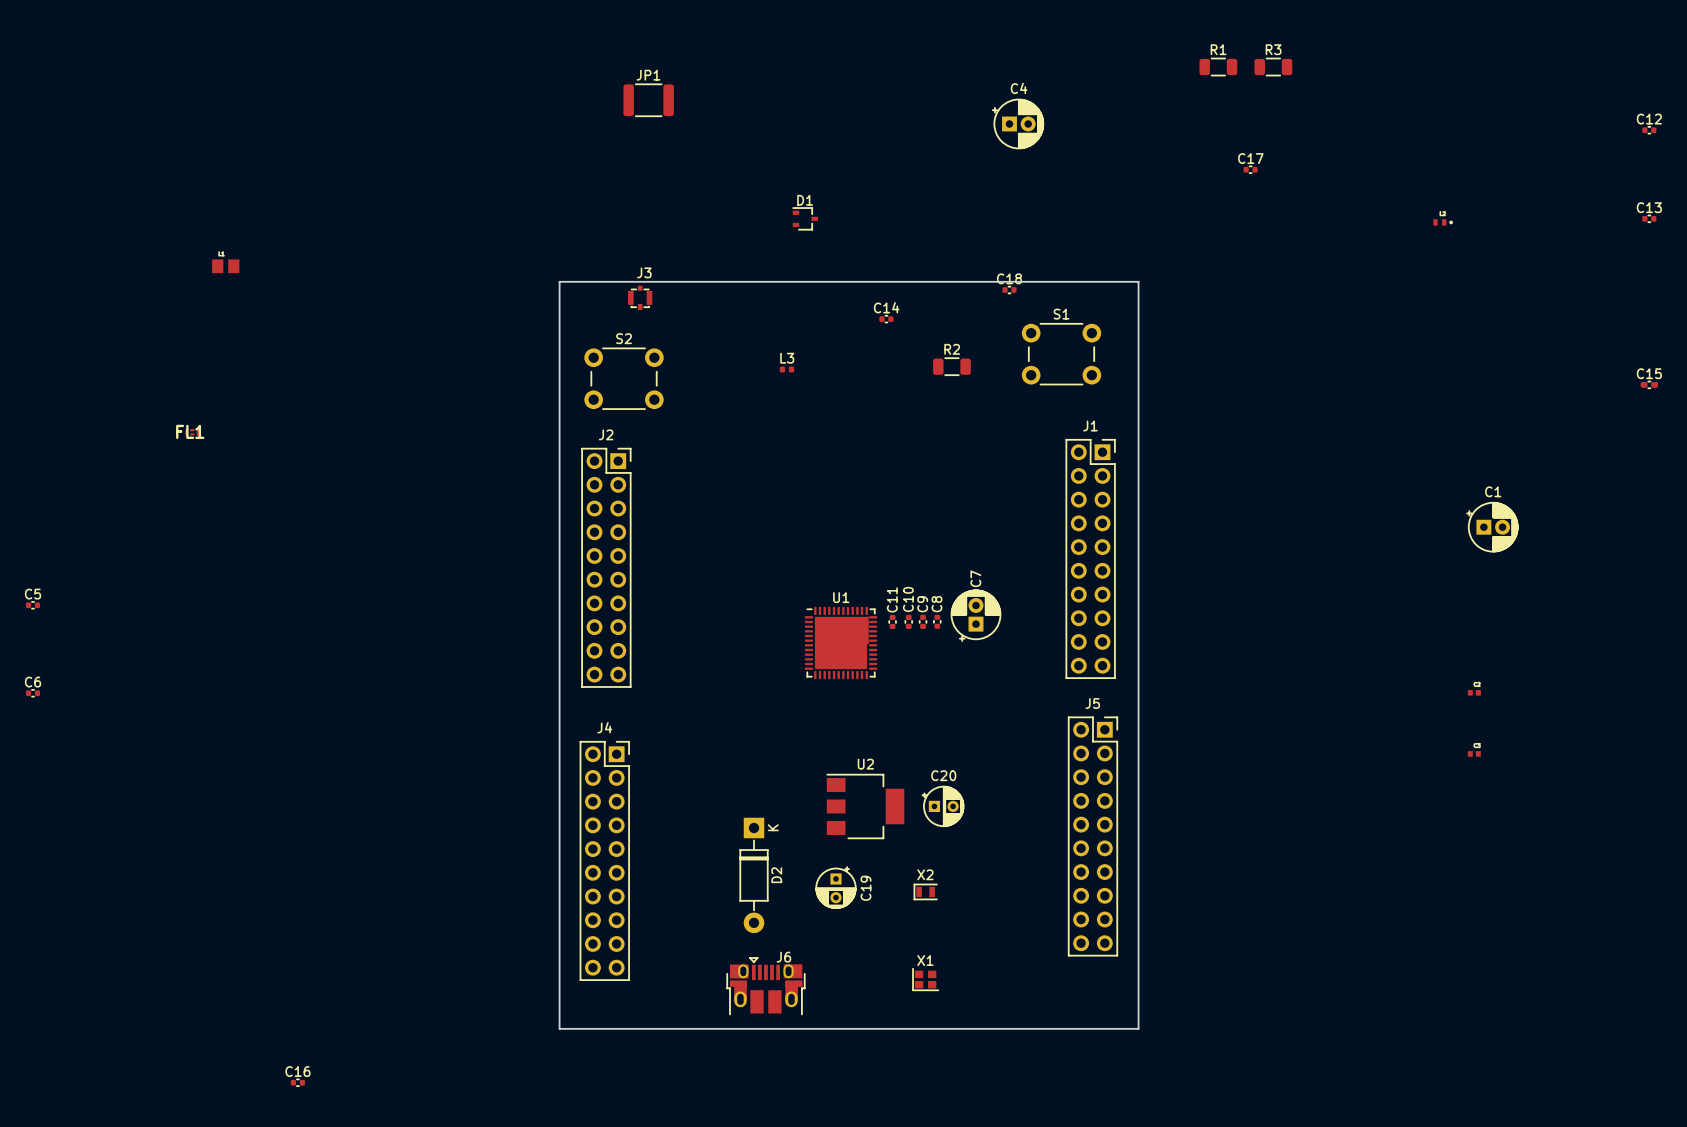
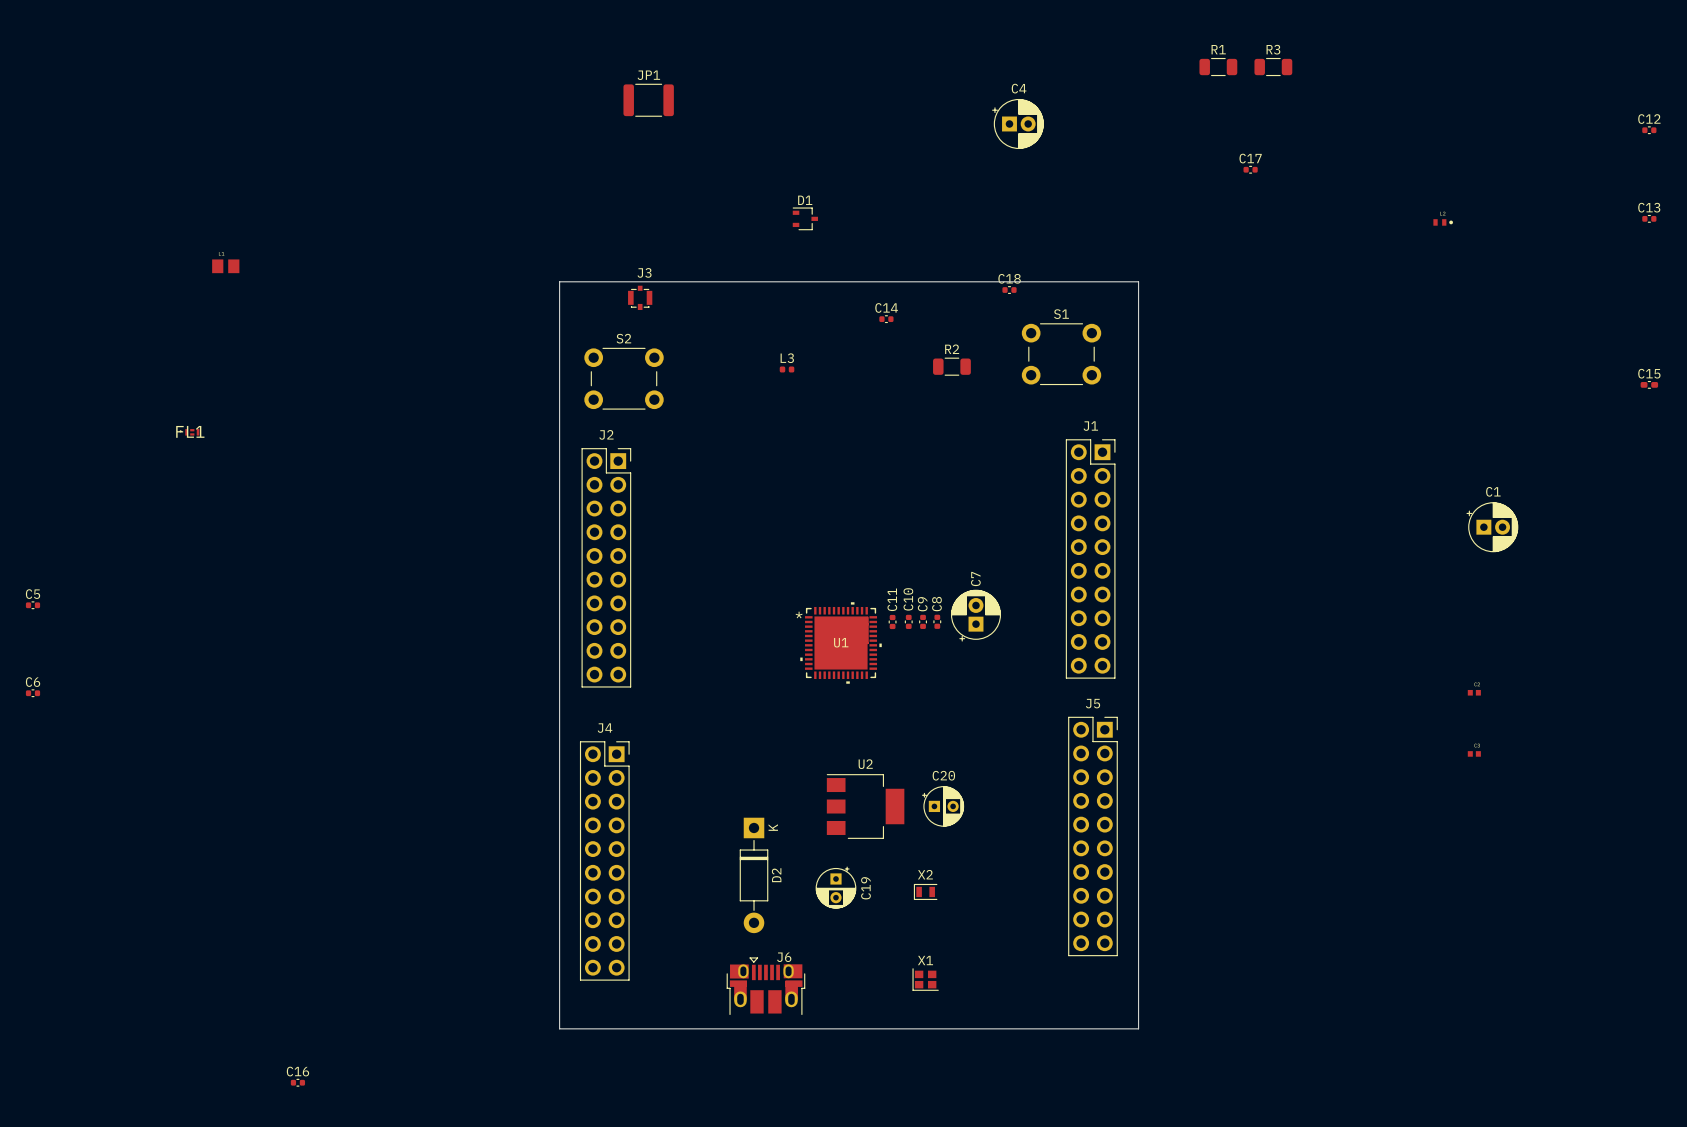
U1 name position: U1 (841, 597) -> U1 (841, 642)
U1 footprint: [804, 606, 878, 680] -> [800, 602, 882, 684]

